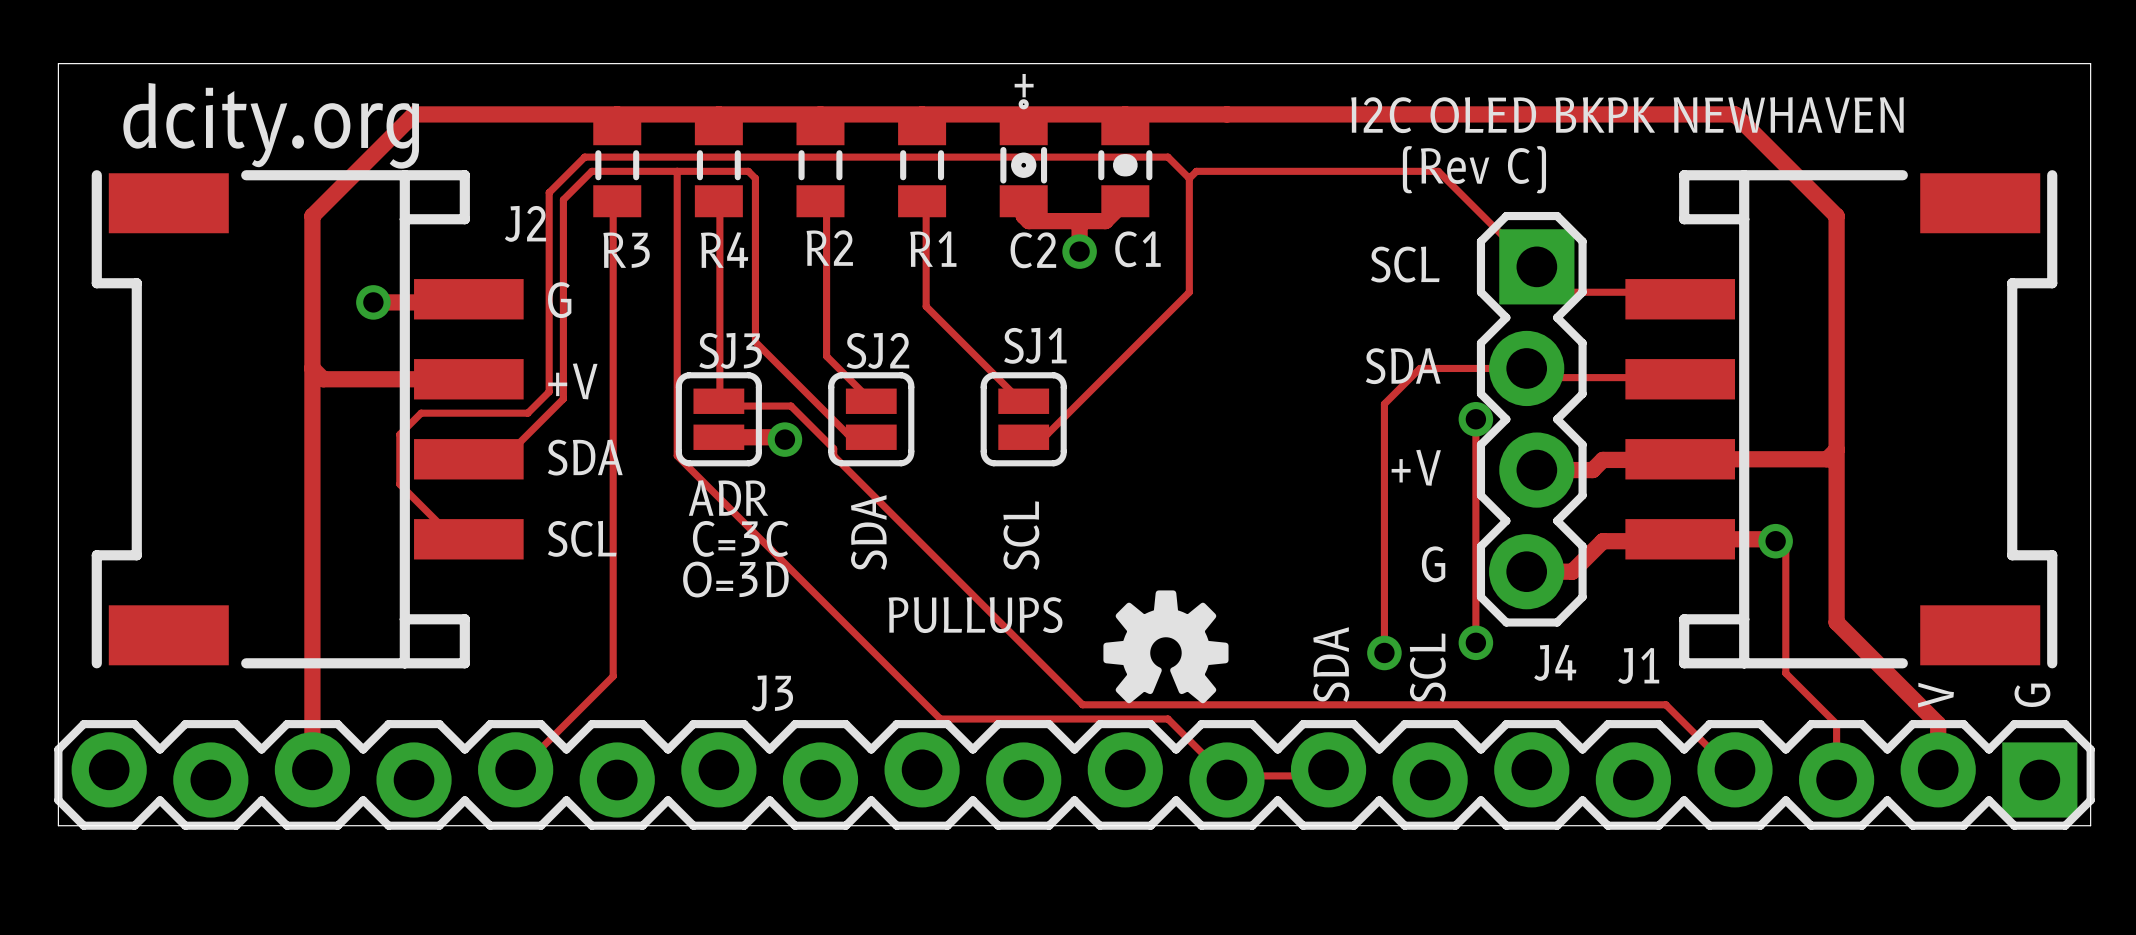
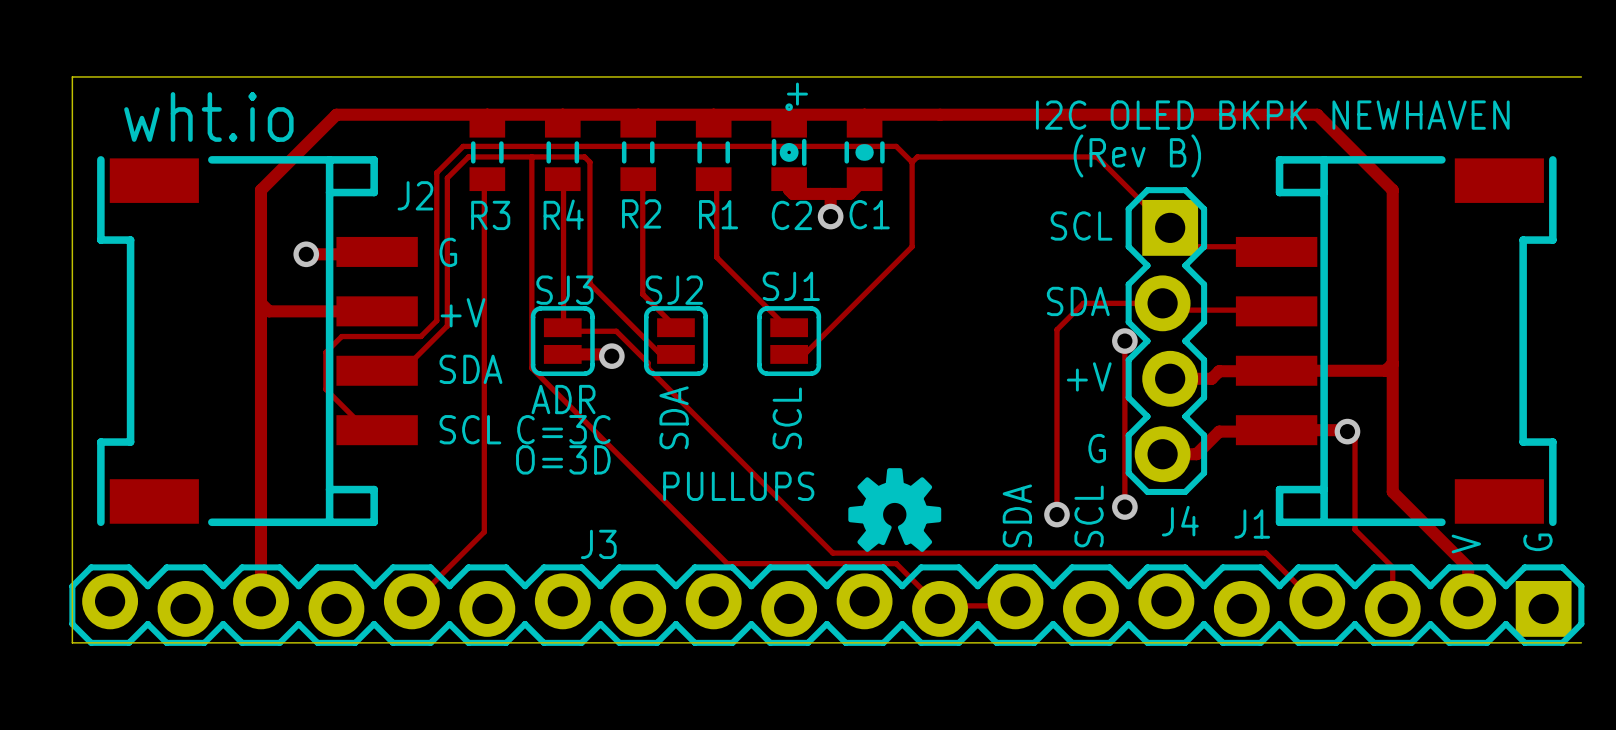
board edge: (2090, 63) (2090, 825) -> none
text: dcity.org (271, 125) -> wht.io (208, 116)
text: (Rev C) (1474, 169) -> (Rev B) (1137, 155)

